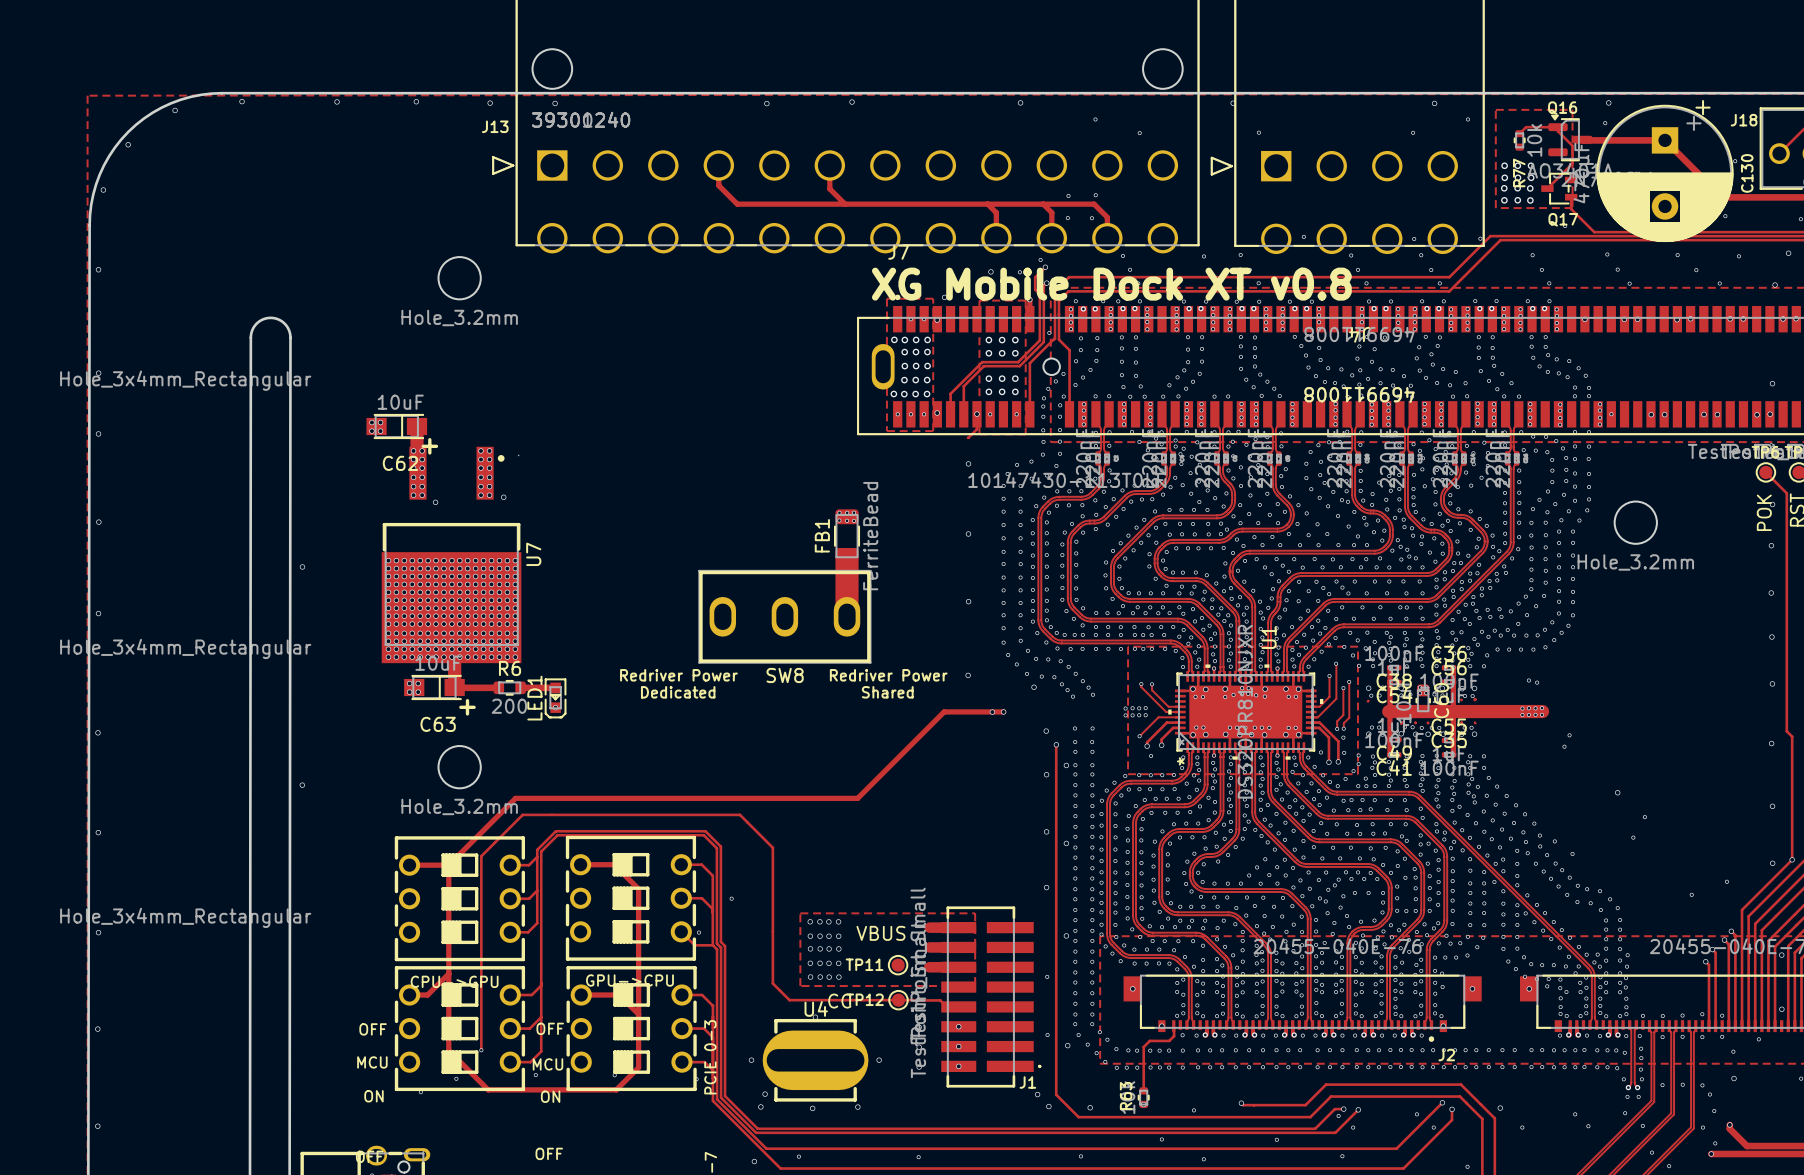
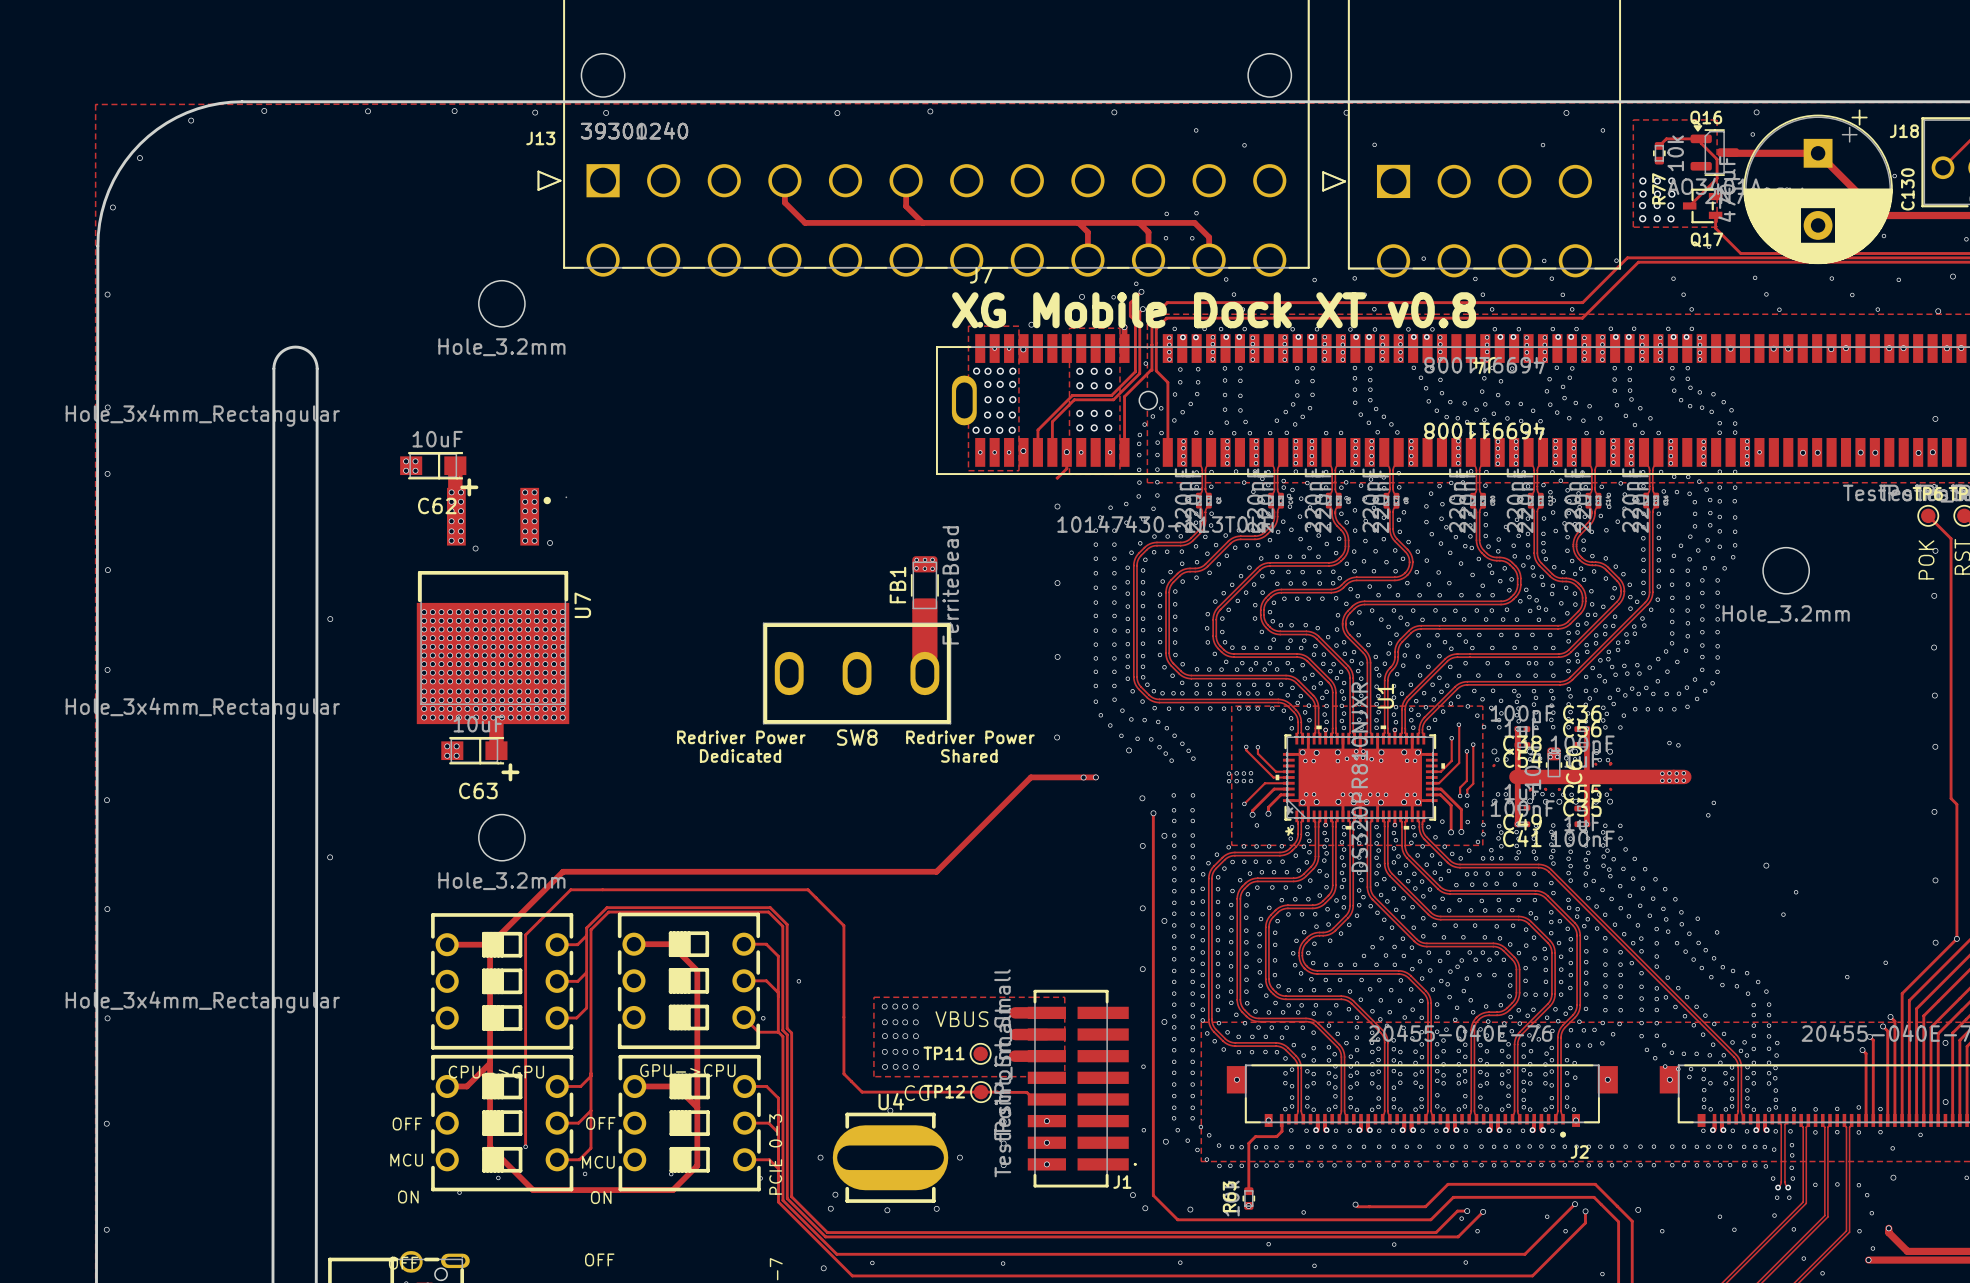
track: (454, 687) (498, 687) -> none
R6: 200 (509, 687) -> none
track: (520, 687) (555, 687) -> none
LED1: (555, 698) -> none
via: (555, 707) -> none

